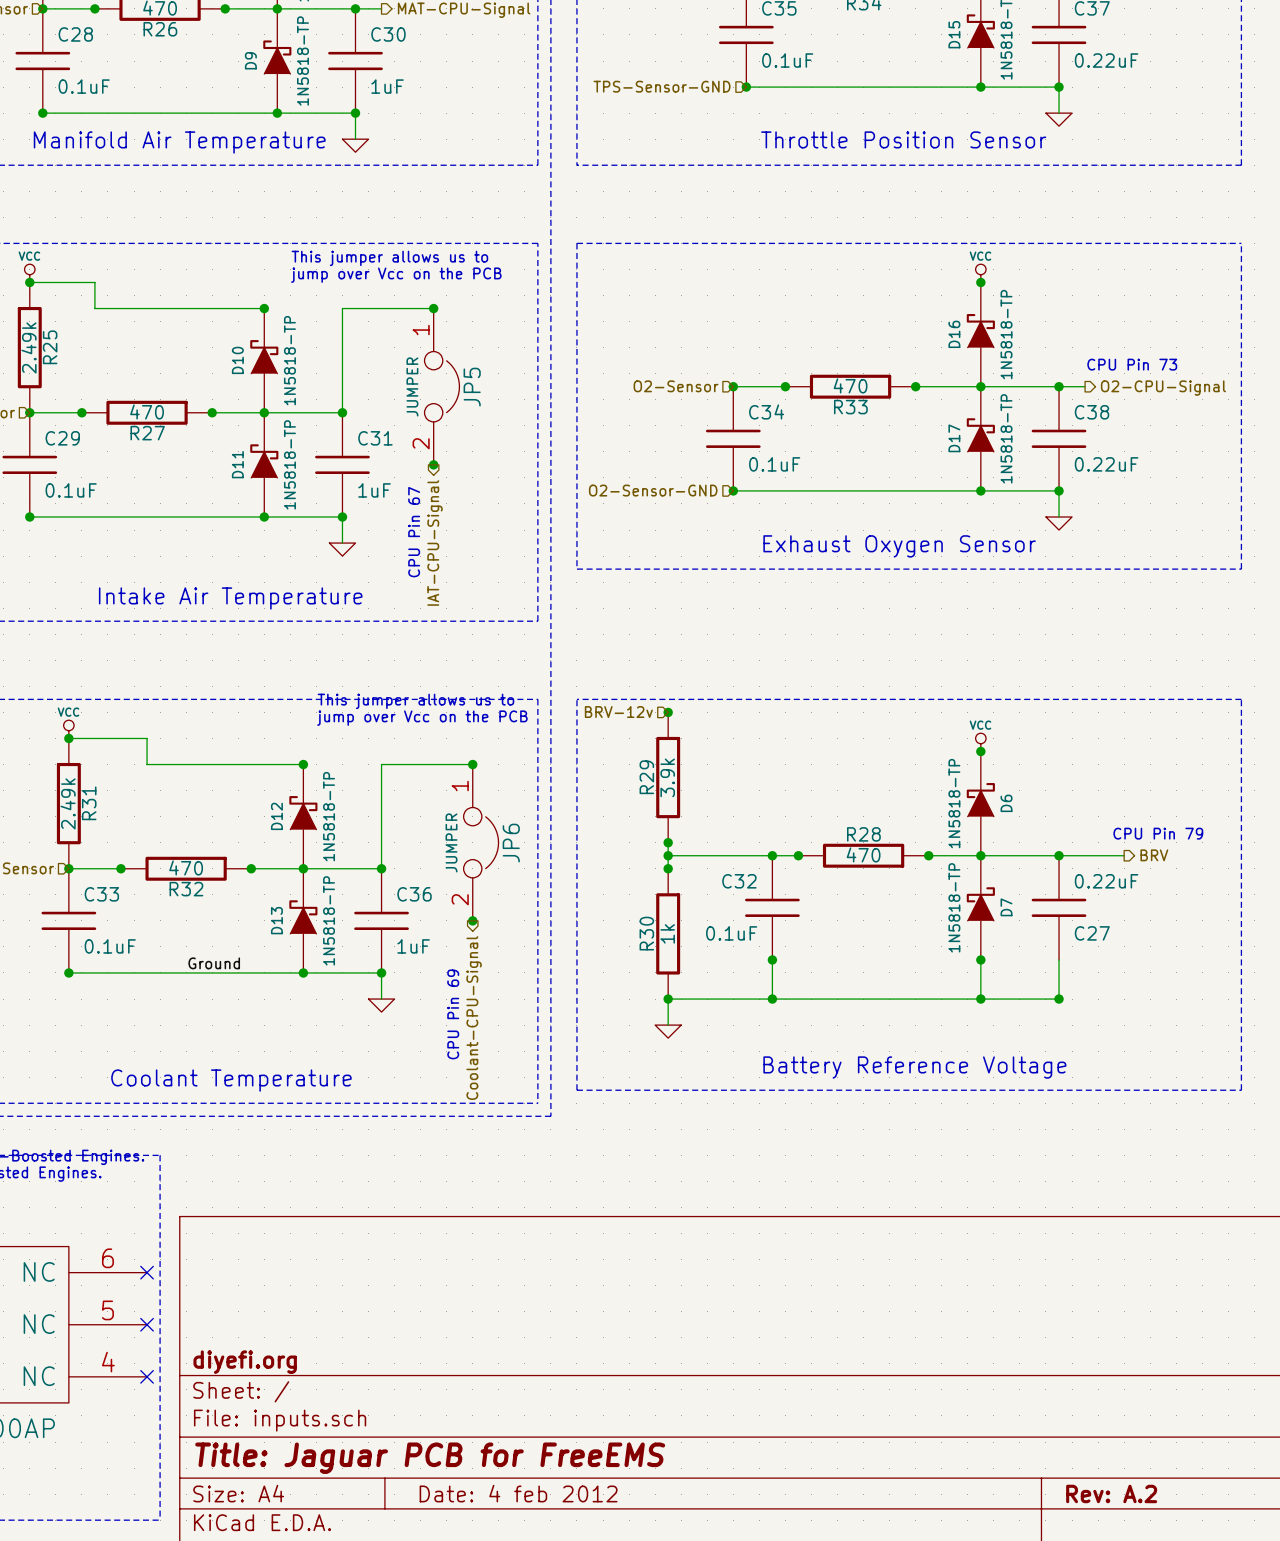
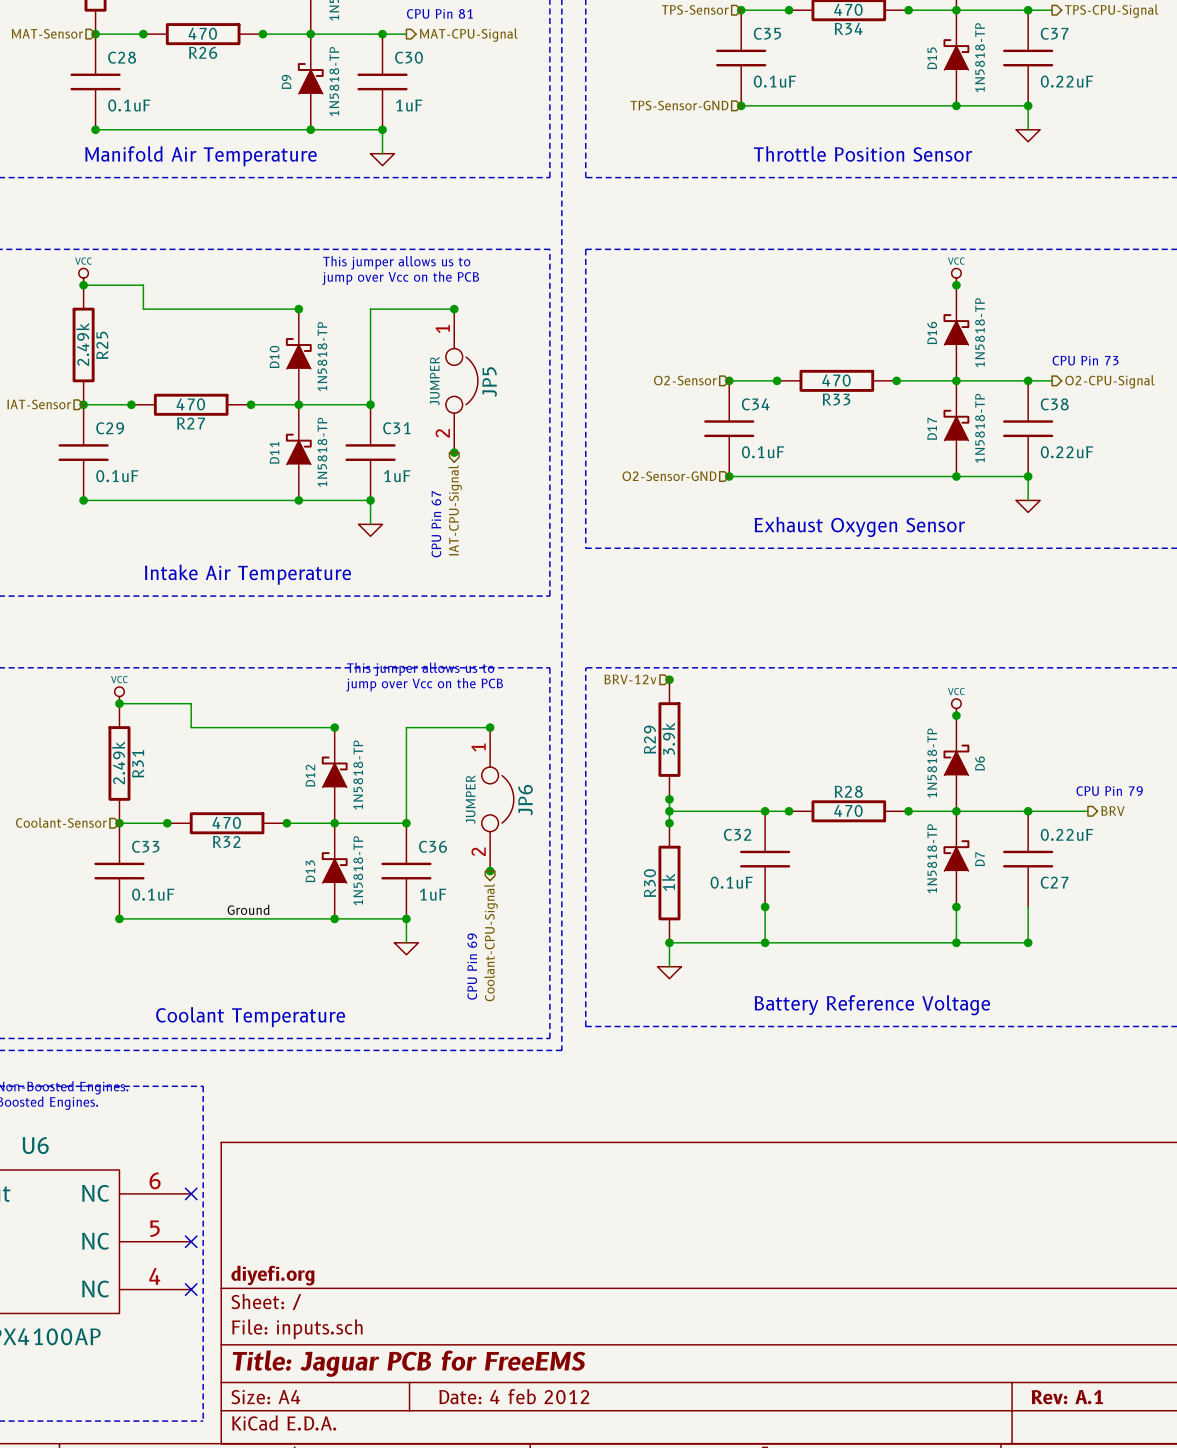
title block: Rev: A.2 (1111, 1493) -> Rev: A.1 (1067, 1397)

